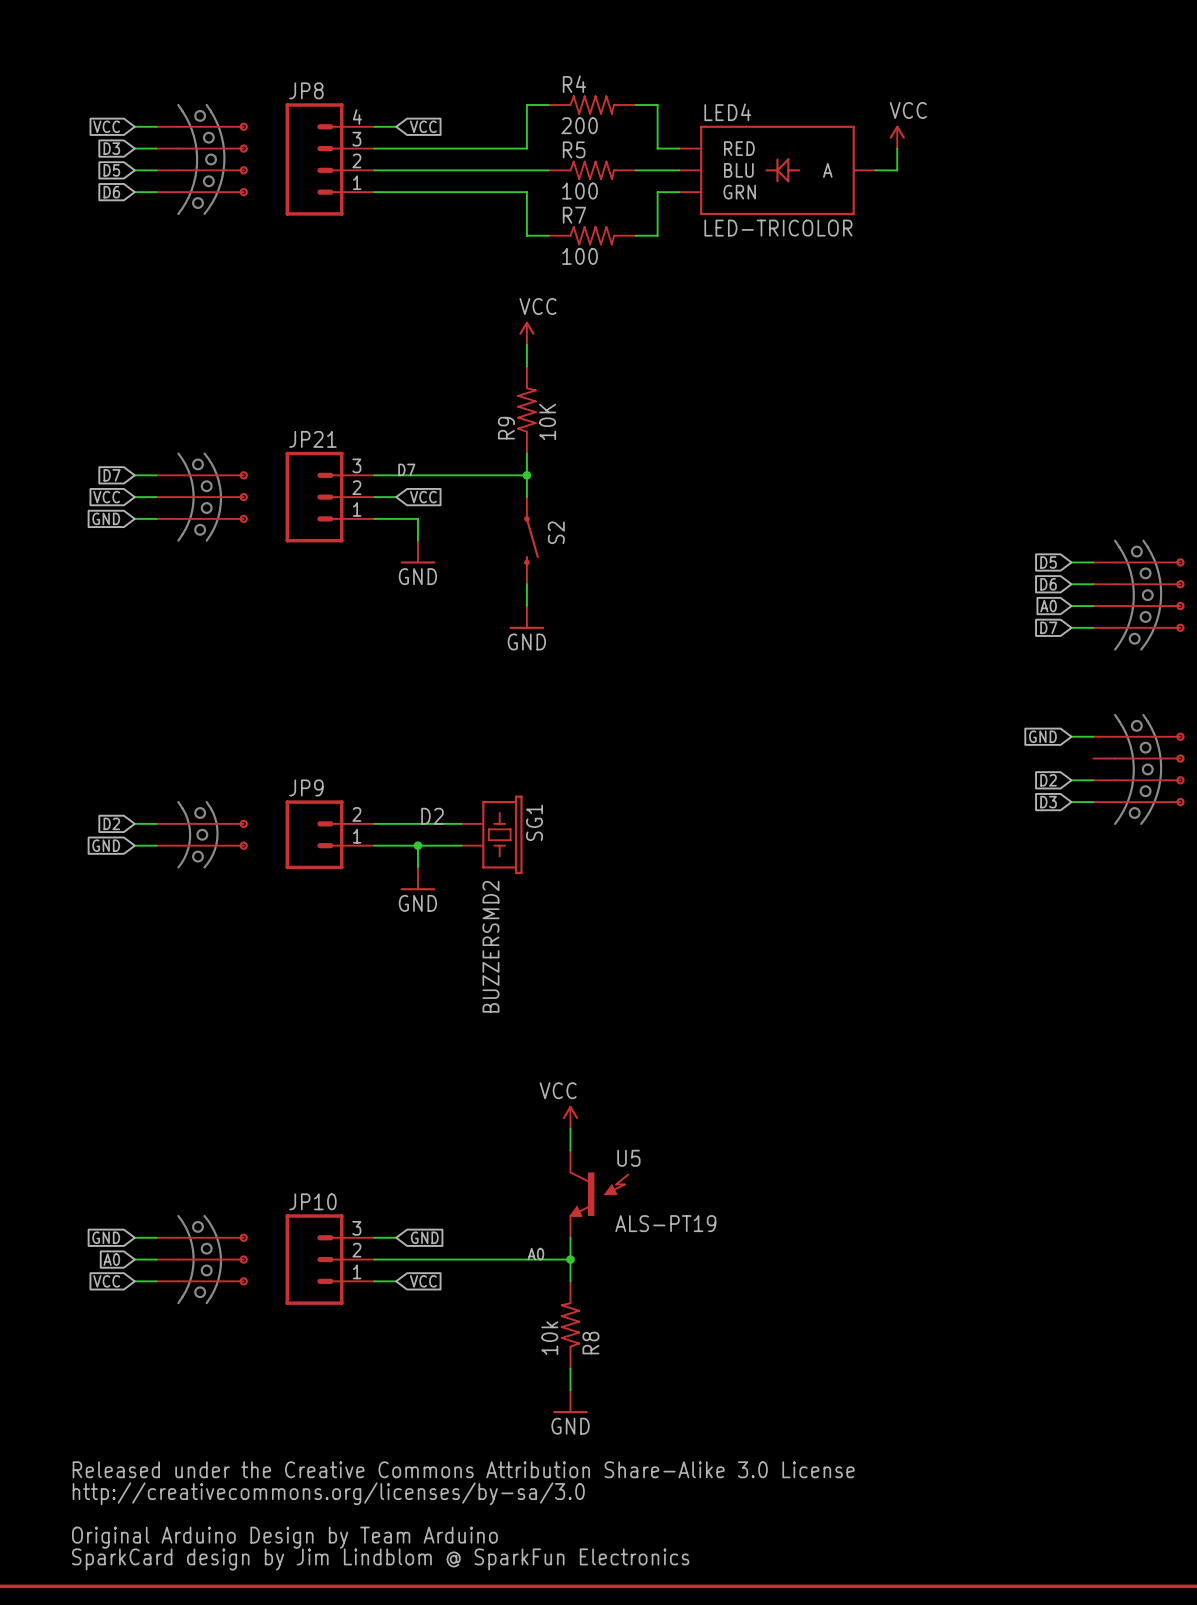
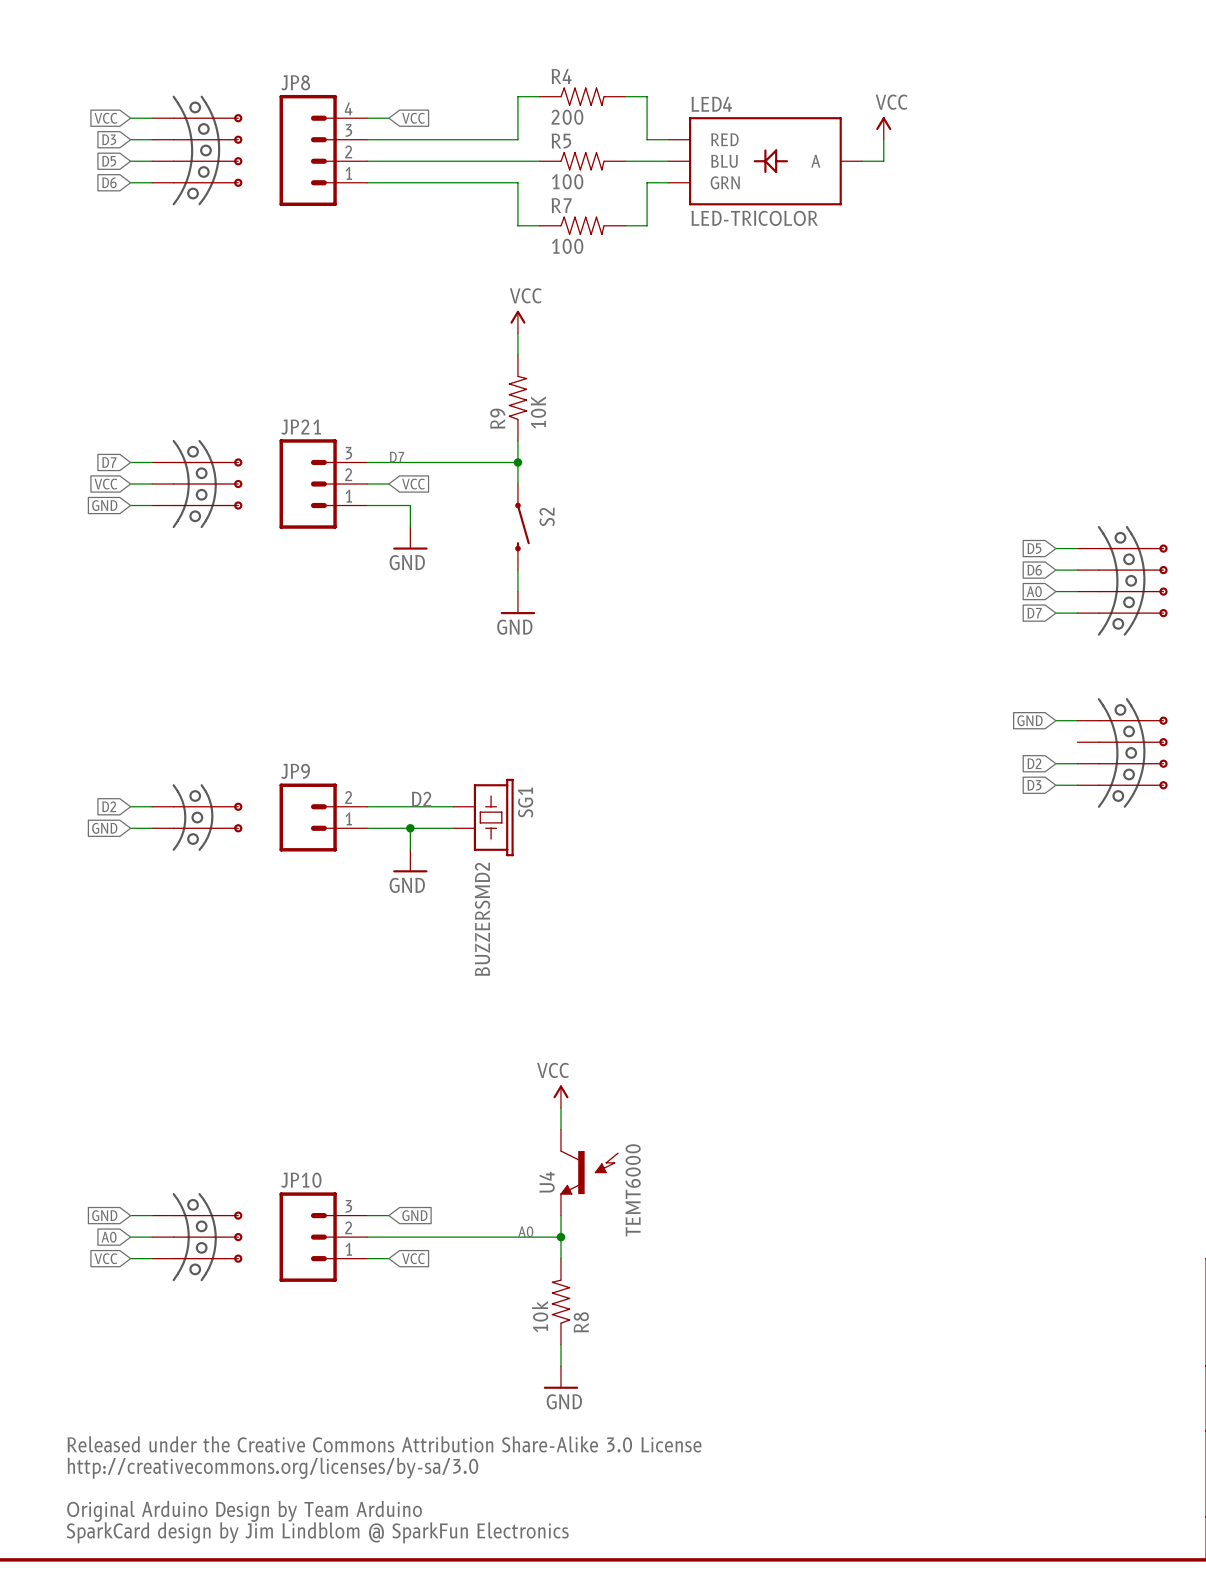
U5 name: U5 (628, 1158) -> U4 (547, 1182)
U5 value: ALS-PT19 (665, 1223) -> TEMT6000 (633, 1190)

